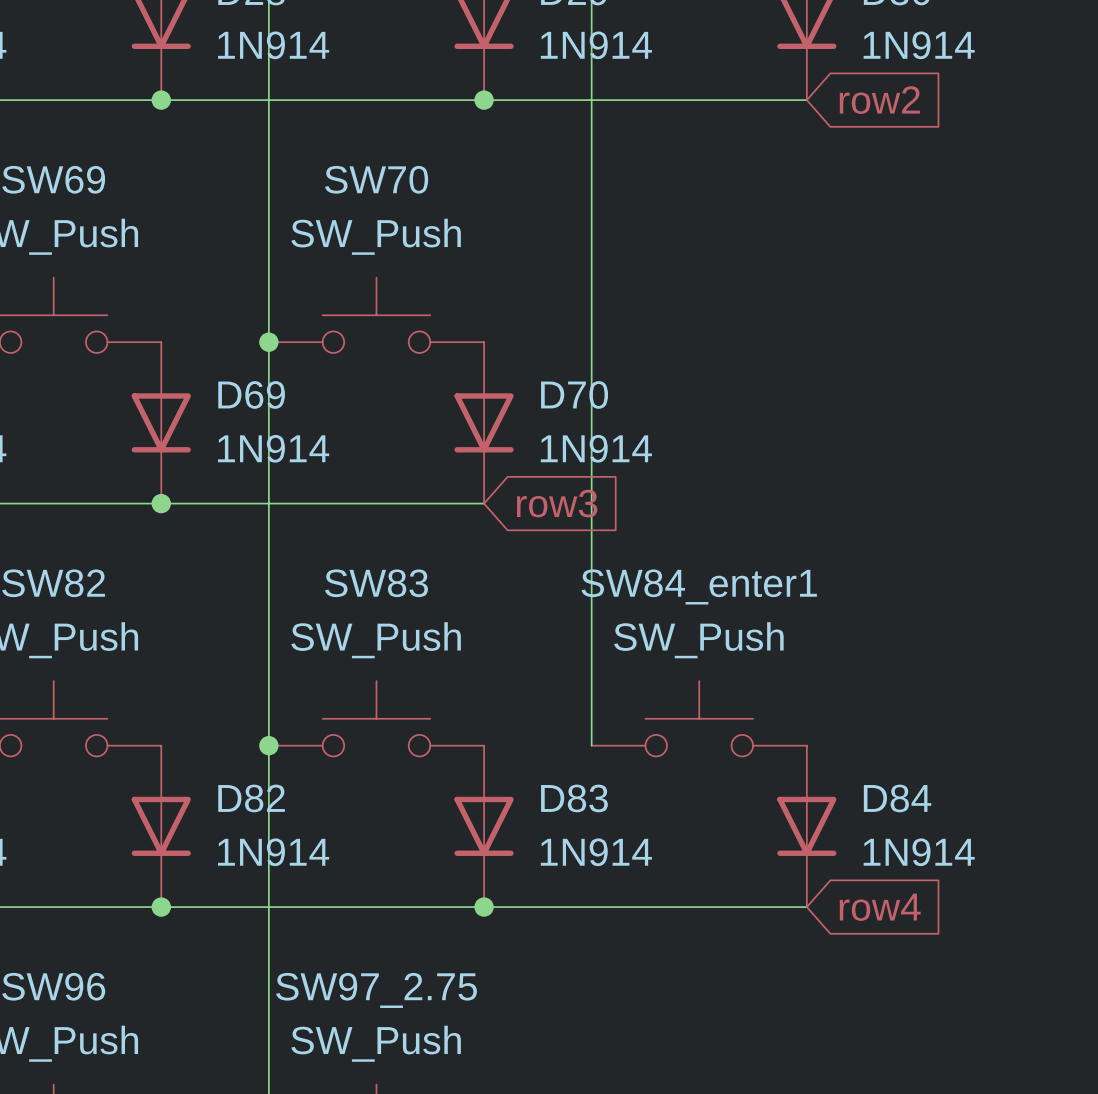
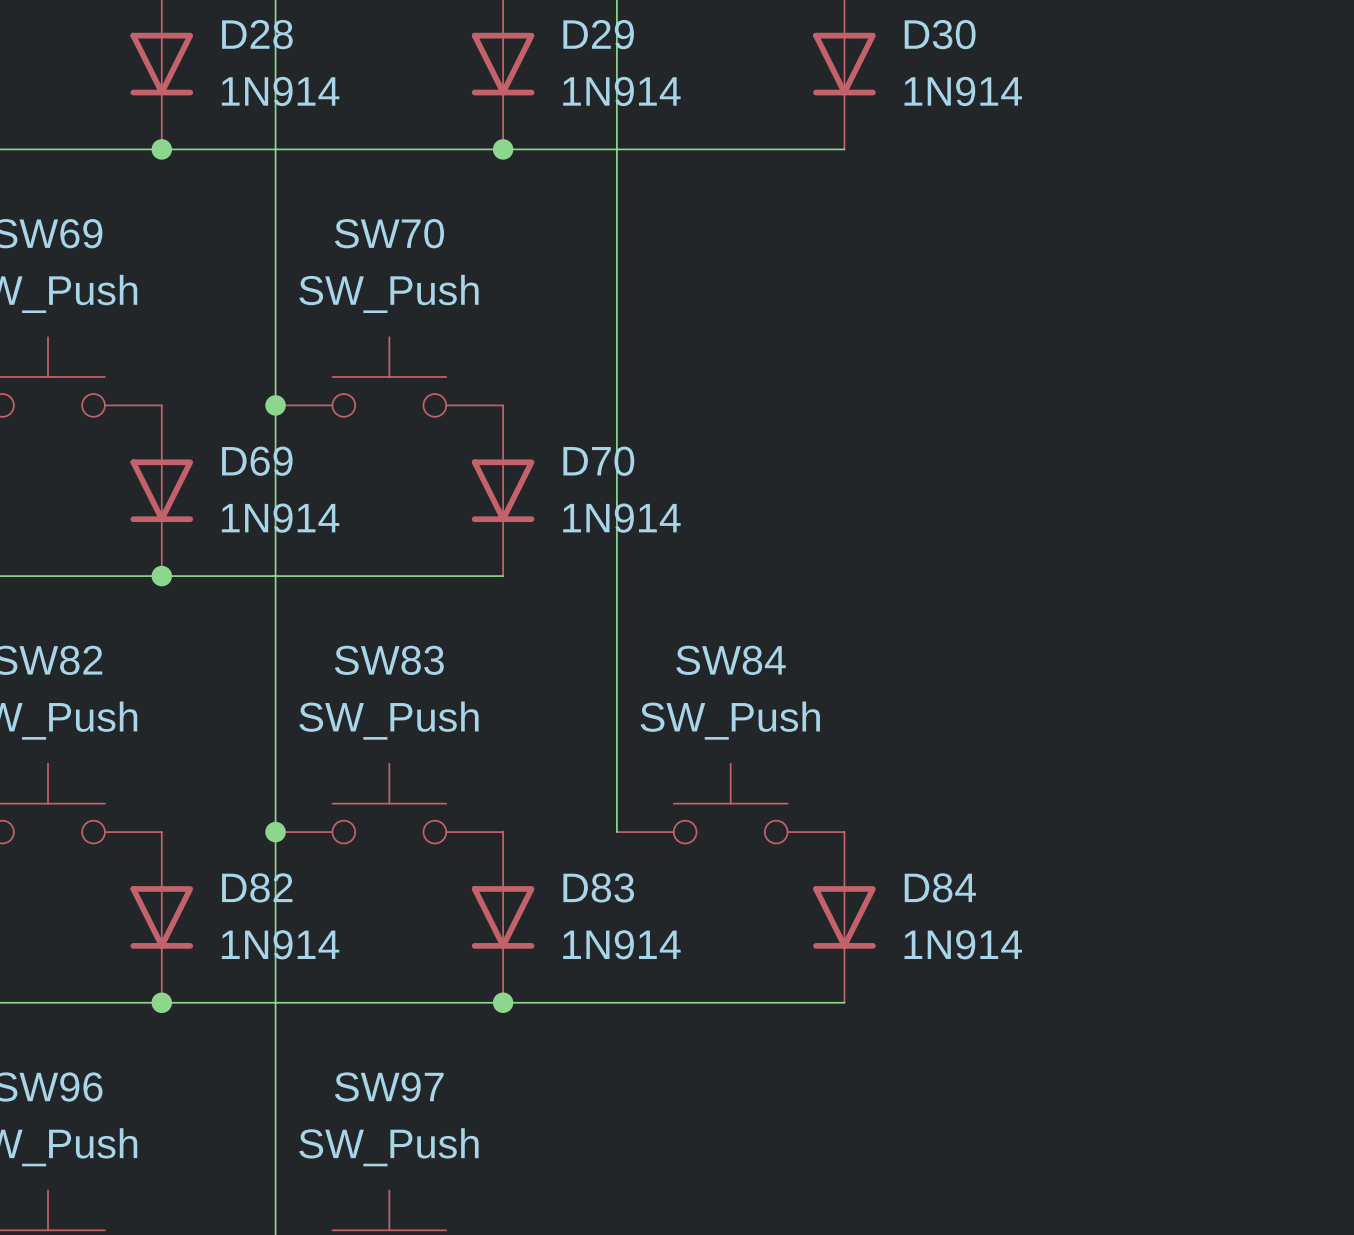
global label: row2 (879, 100) -> none
global label: row3 (557, 503) -> none
SW84_enter1 name: SW84_enter1 (699, 586) -> SW84 (731, 660)
global label: row4 (880, 907) -> none
SW97_2.75 name: SW97_2.75 (376, 990) -> SW97 (389, 1087)

